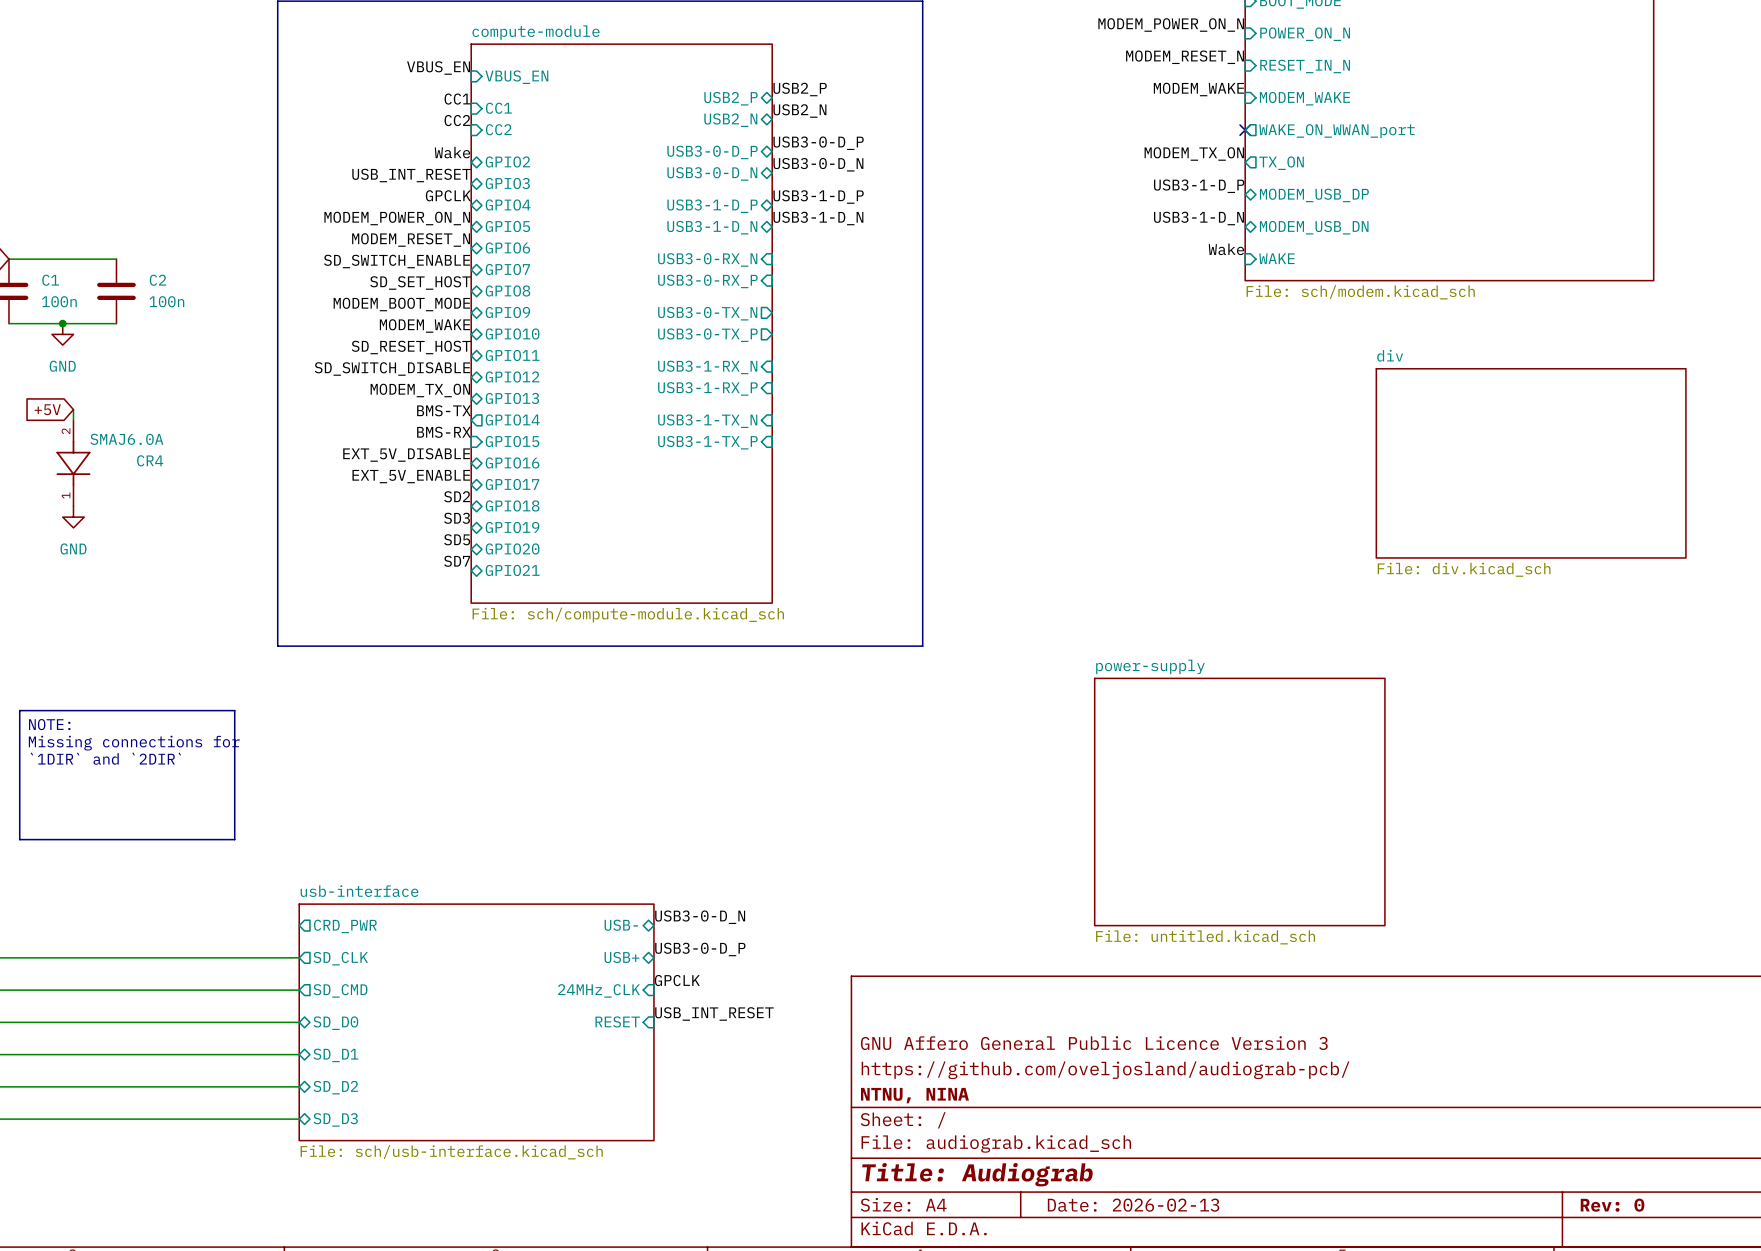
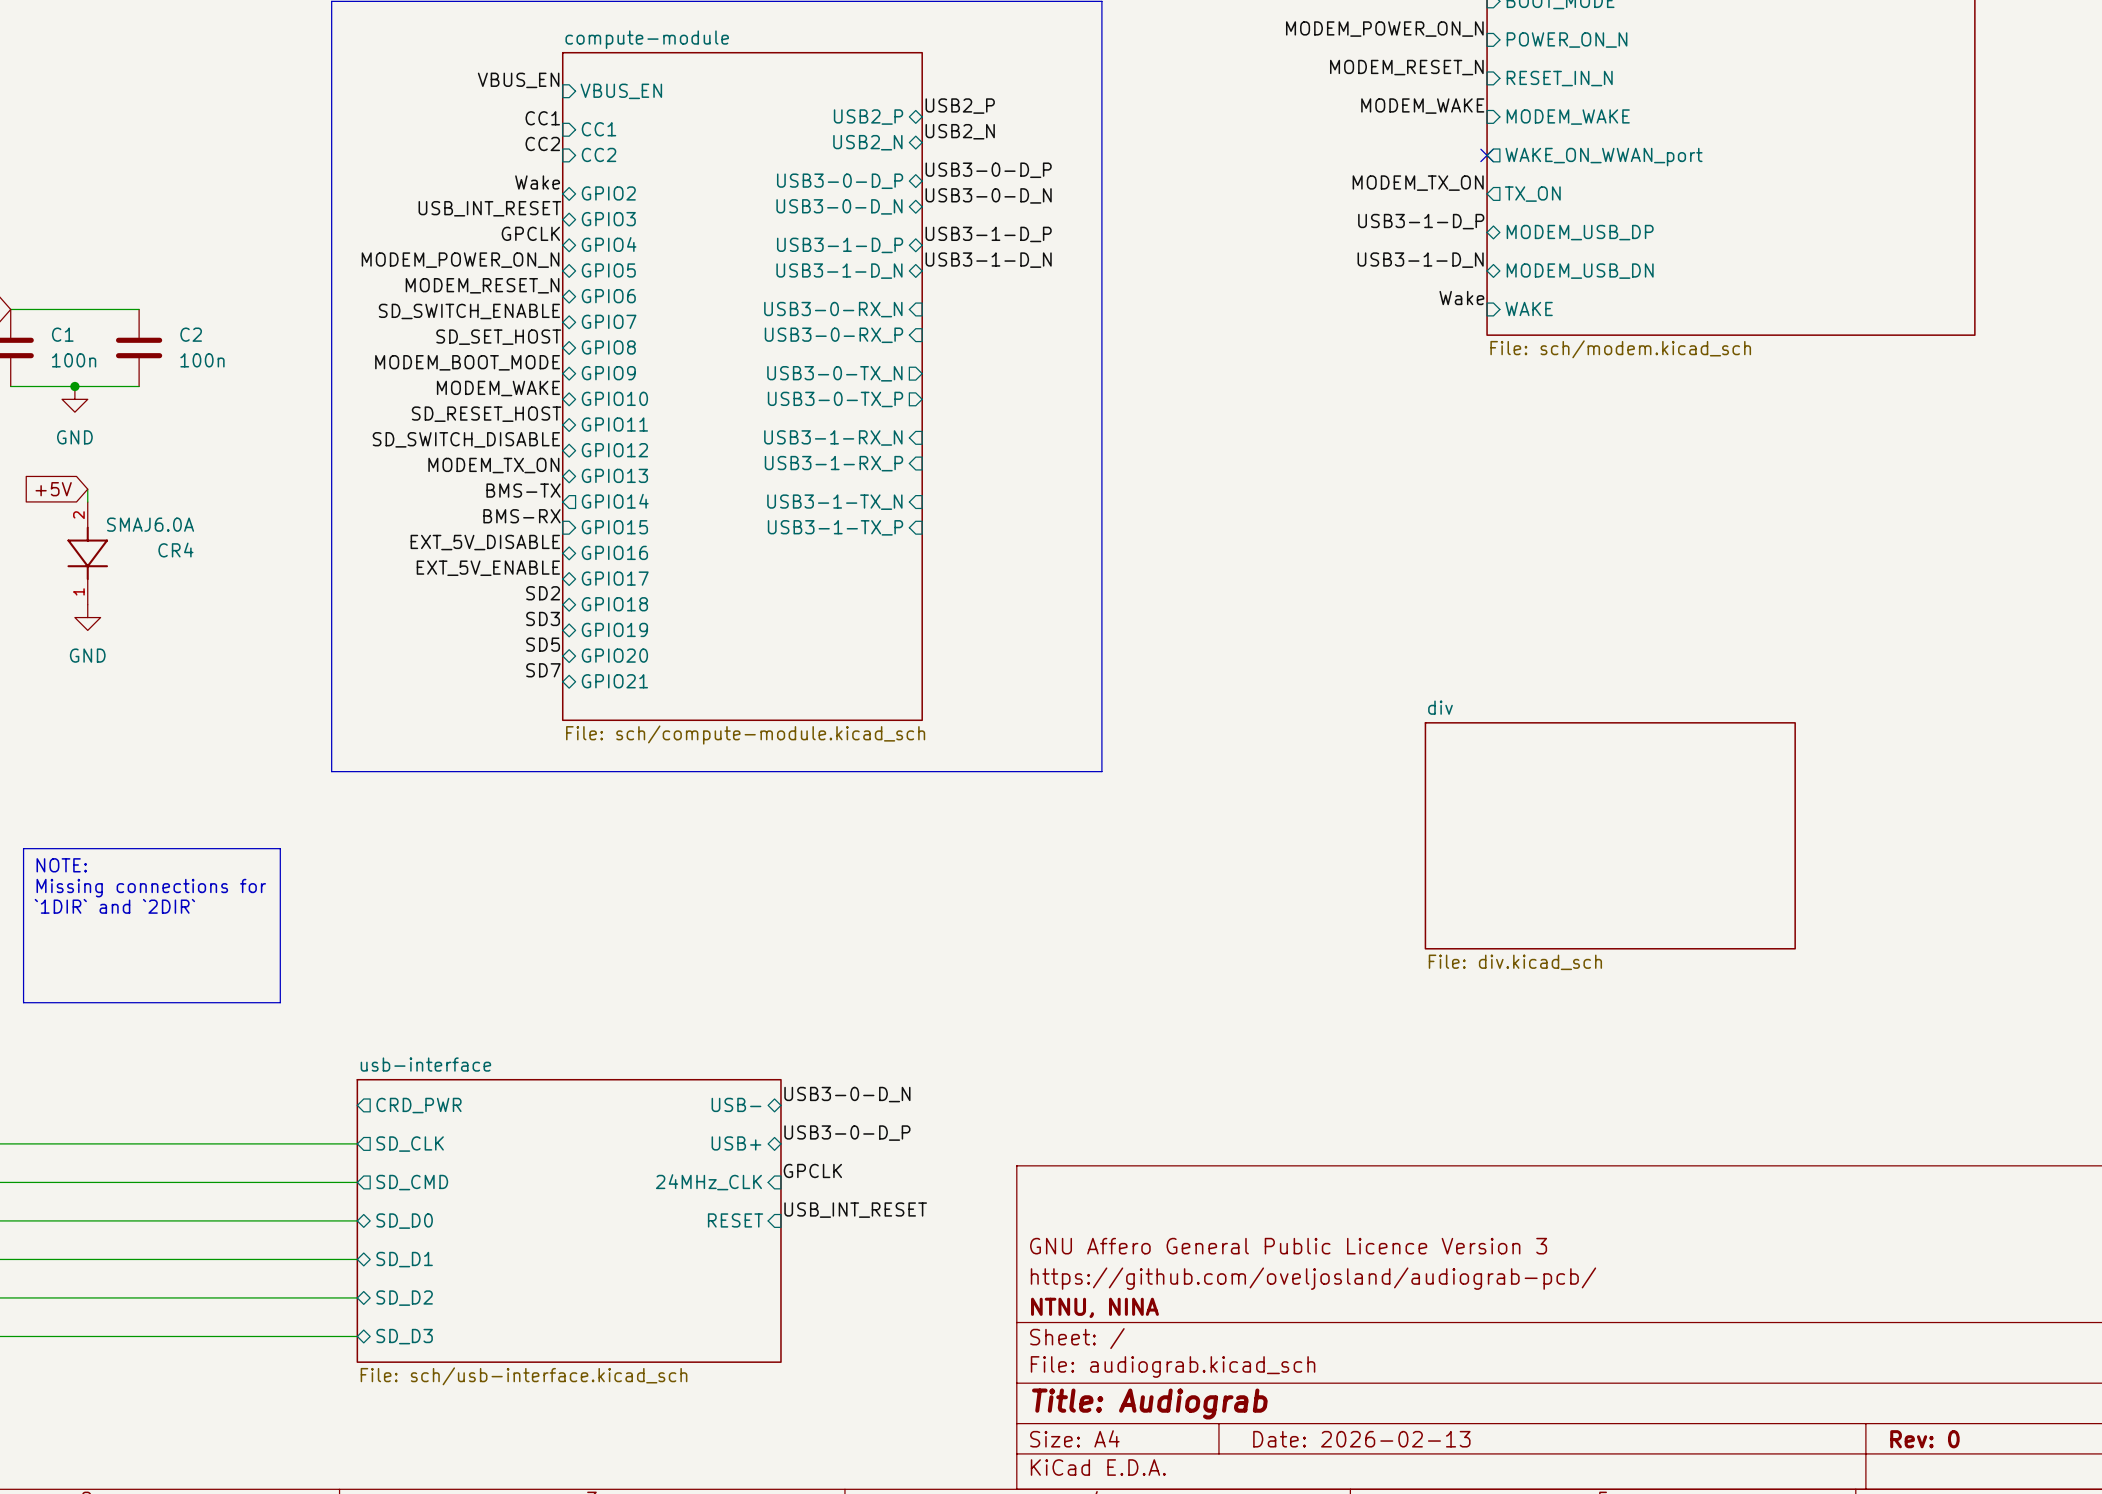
sheet div: File: div.kicad_sch (1531, 463) -> none
sheet div: none -> File: div.kicad_sch (1610, 835)
sheet power-supply: File: untitled.kicad_sch (1239, 801) -> none

